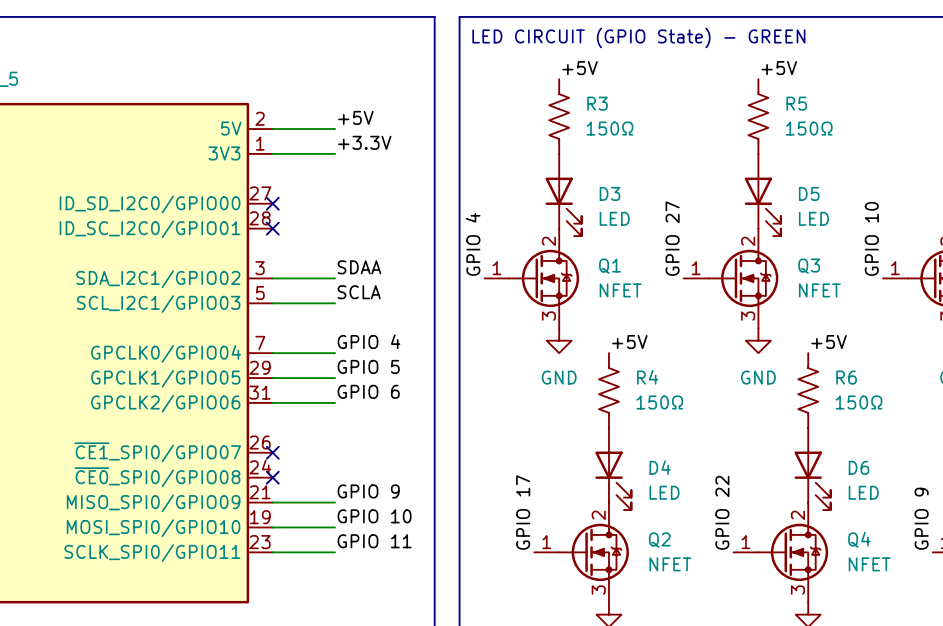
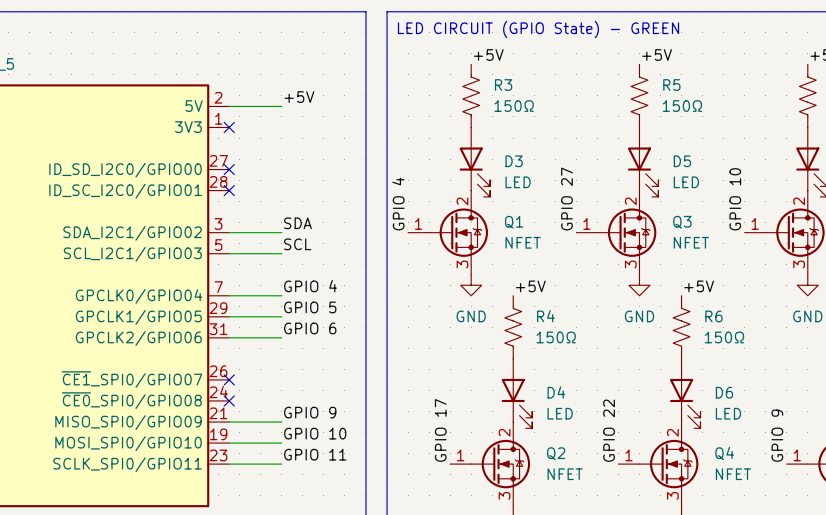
label: +3.3V (364, 142) -> none
wire: (272, 153) (335, 153) -> none
no-connect mark: none -> (229, 127)
label: SDAA (359, 267) -> SDA (297, 223)
label: SCLA (359, 292) -> SCL (297, 244)

